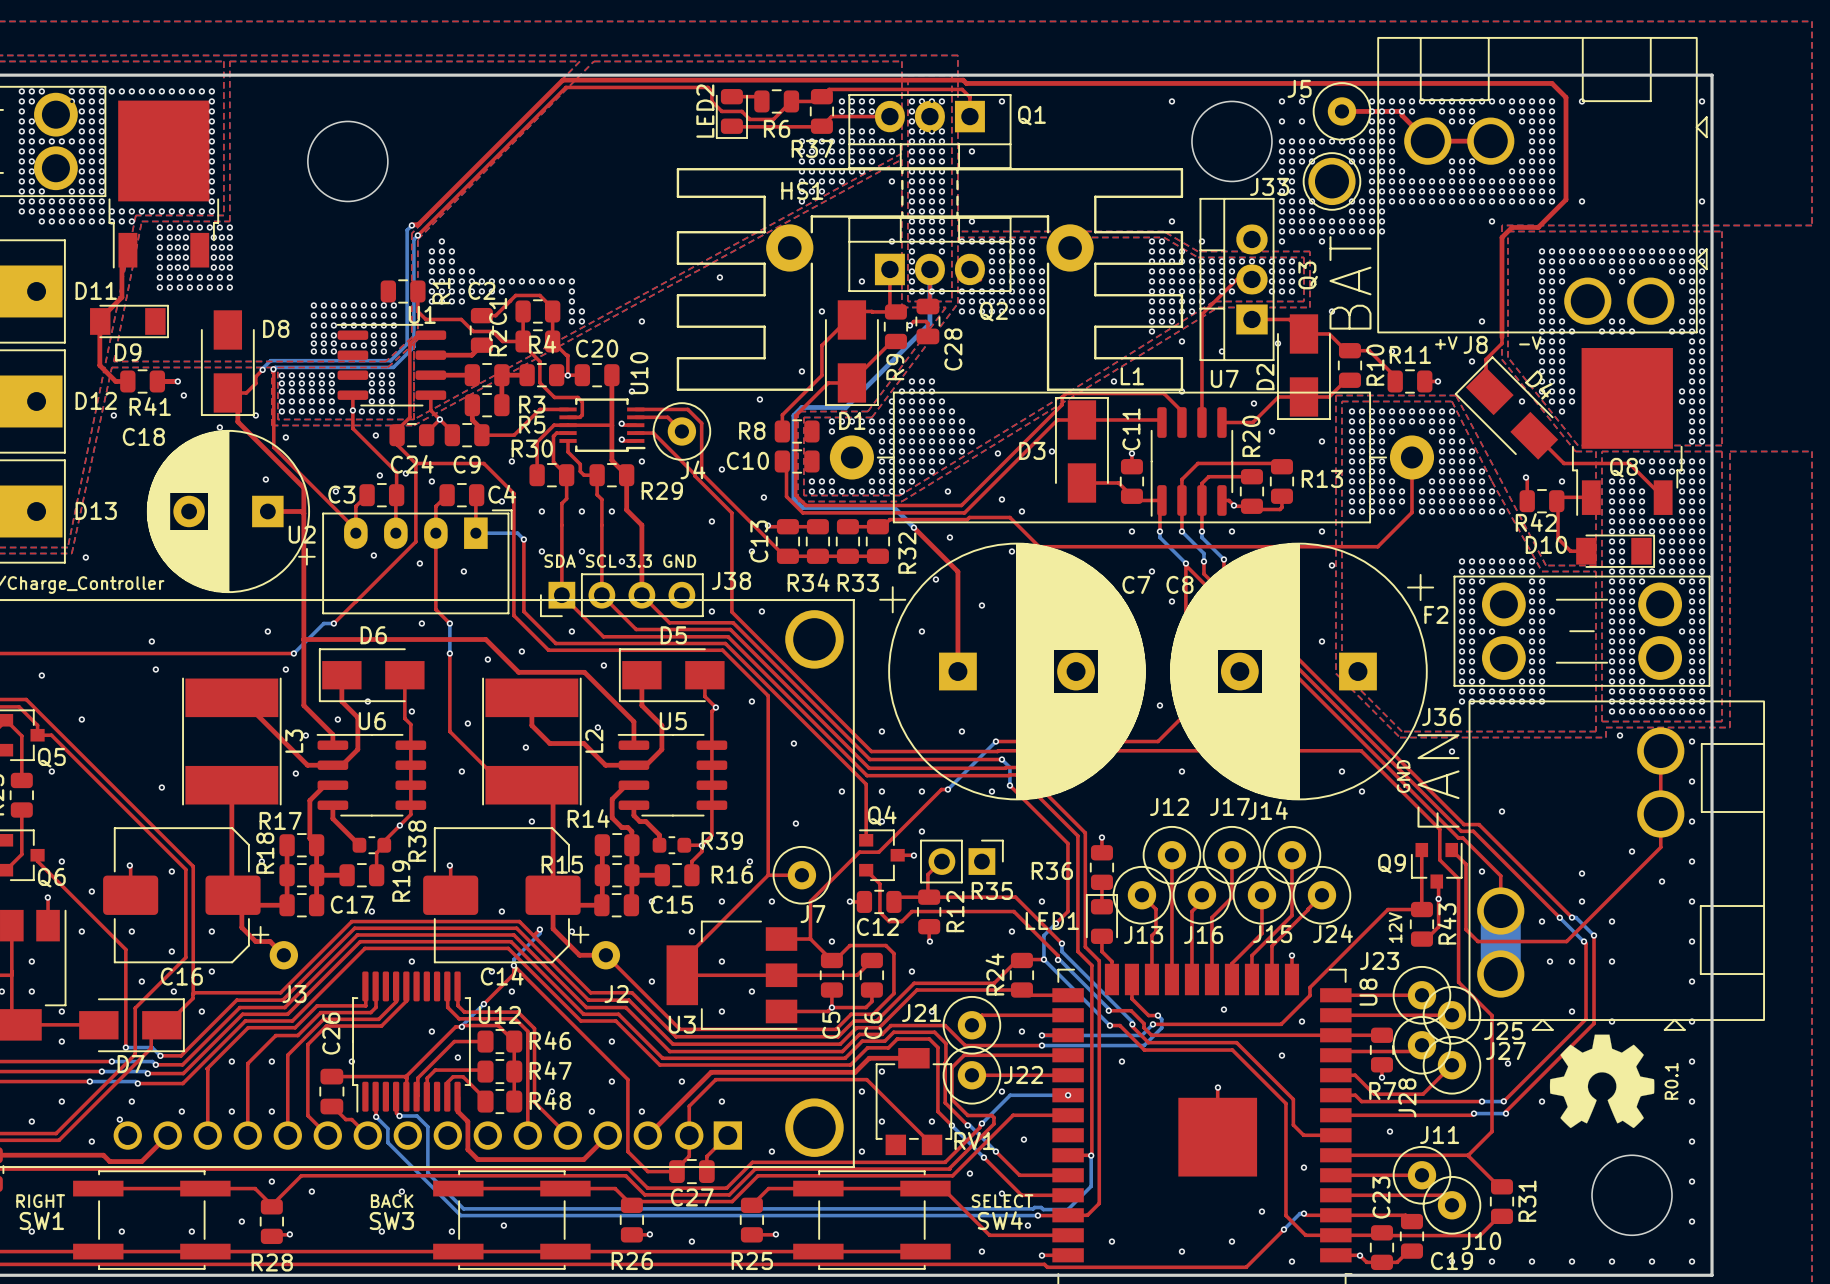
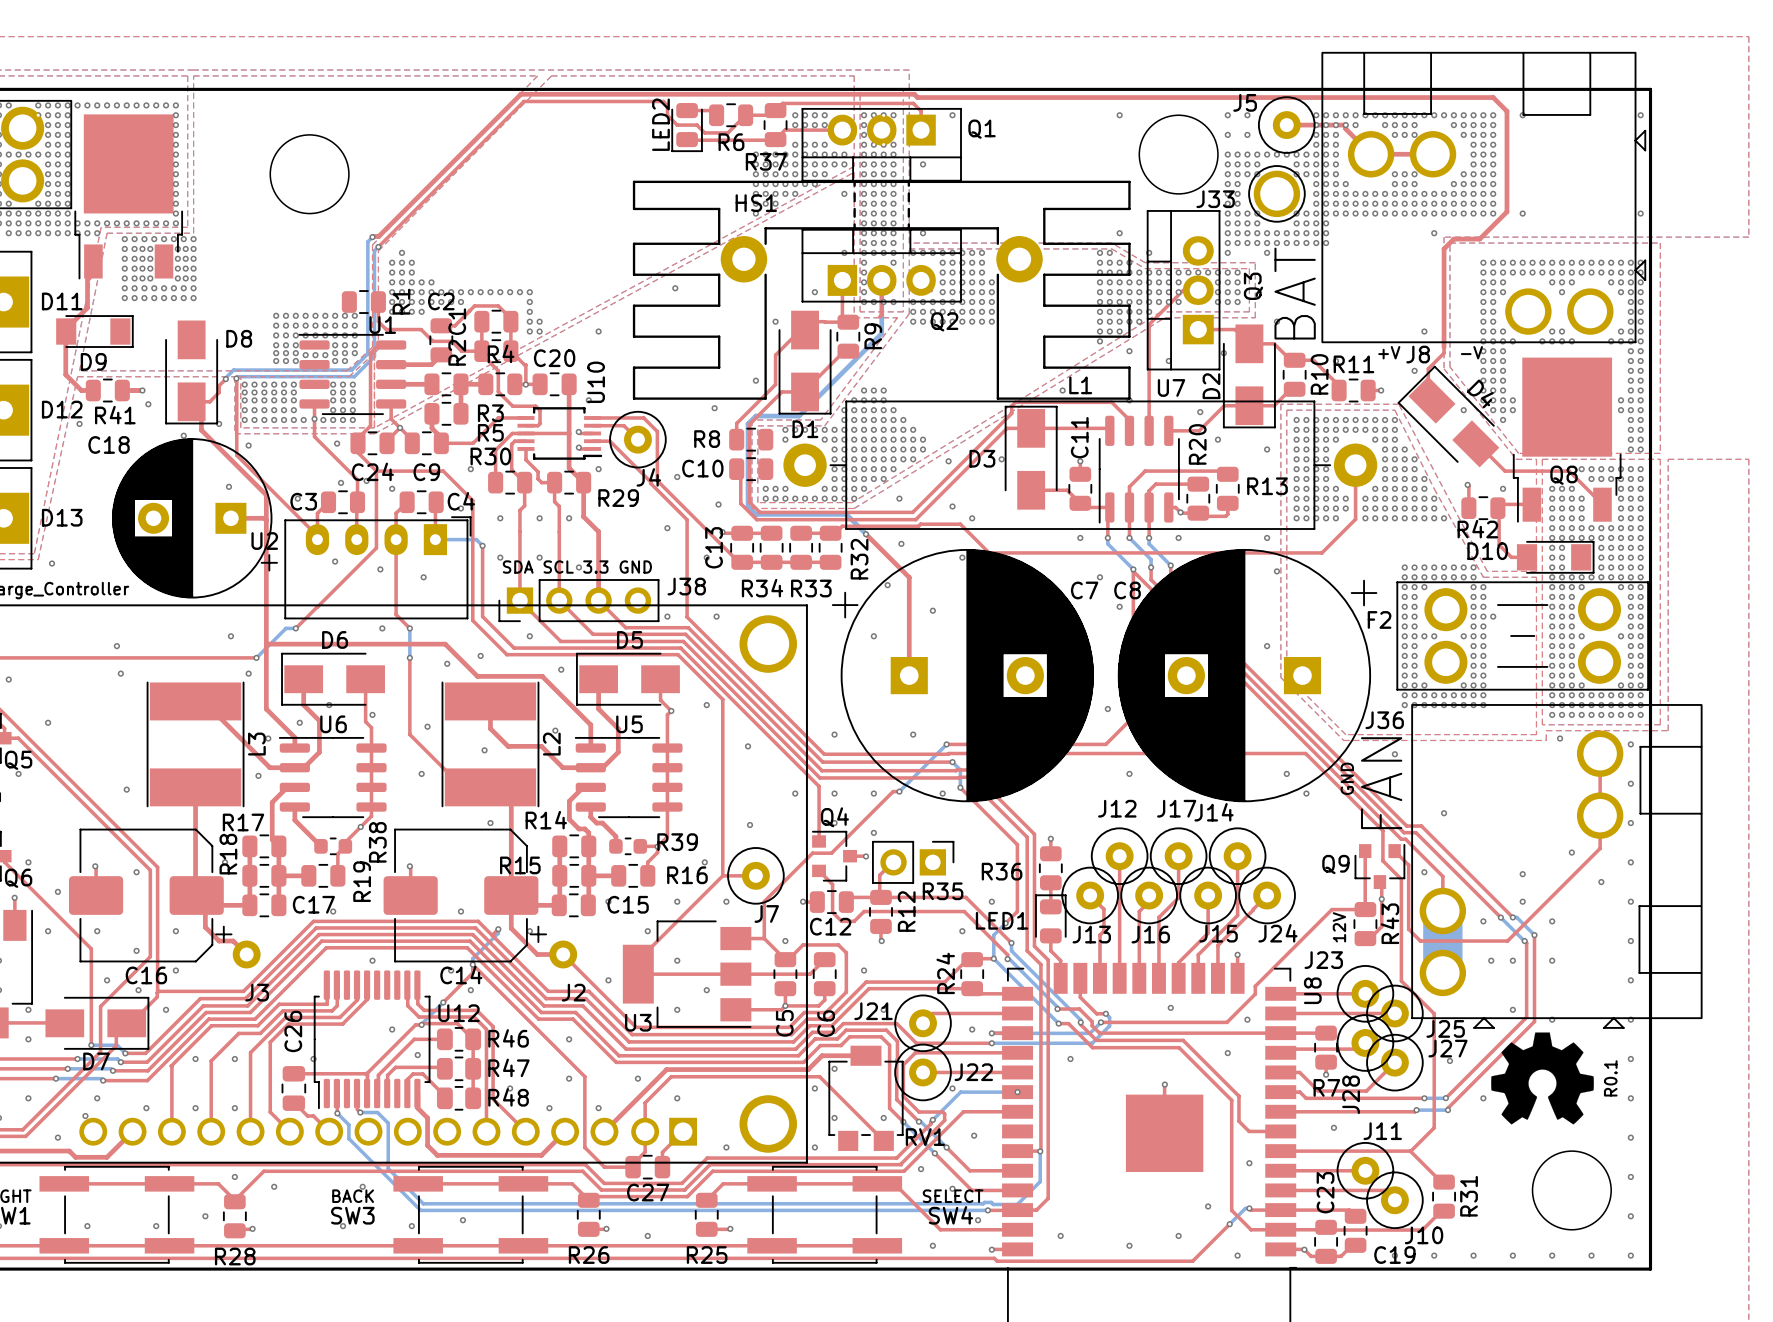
C28: (927, 321) -> none
top track: (909, 325) (913, 321) (925, 321) (927, 323) (927, 336) -> none
via: (909, 325) -> none
R9 name position: R9 (895, 367) -> R9 (873, 336)

